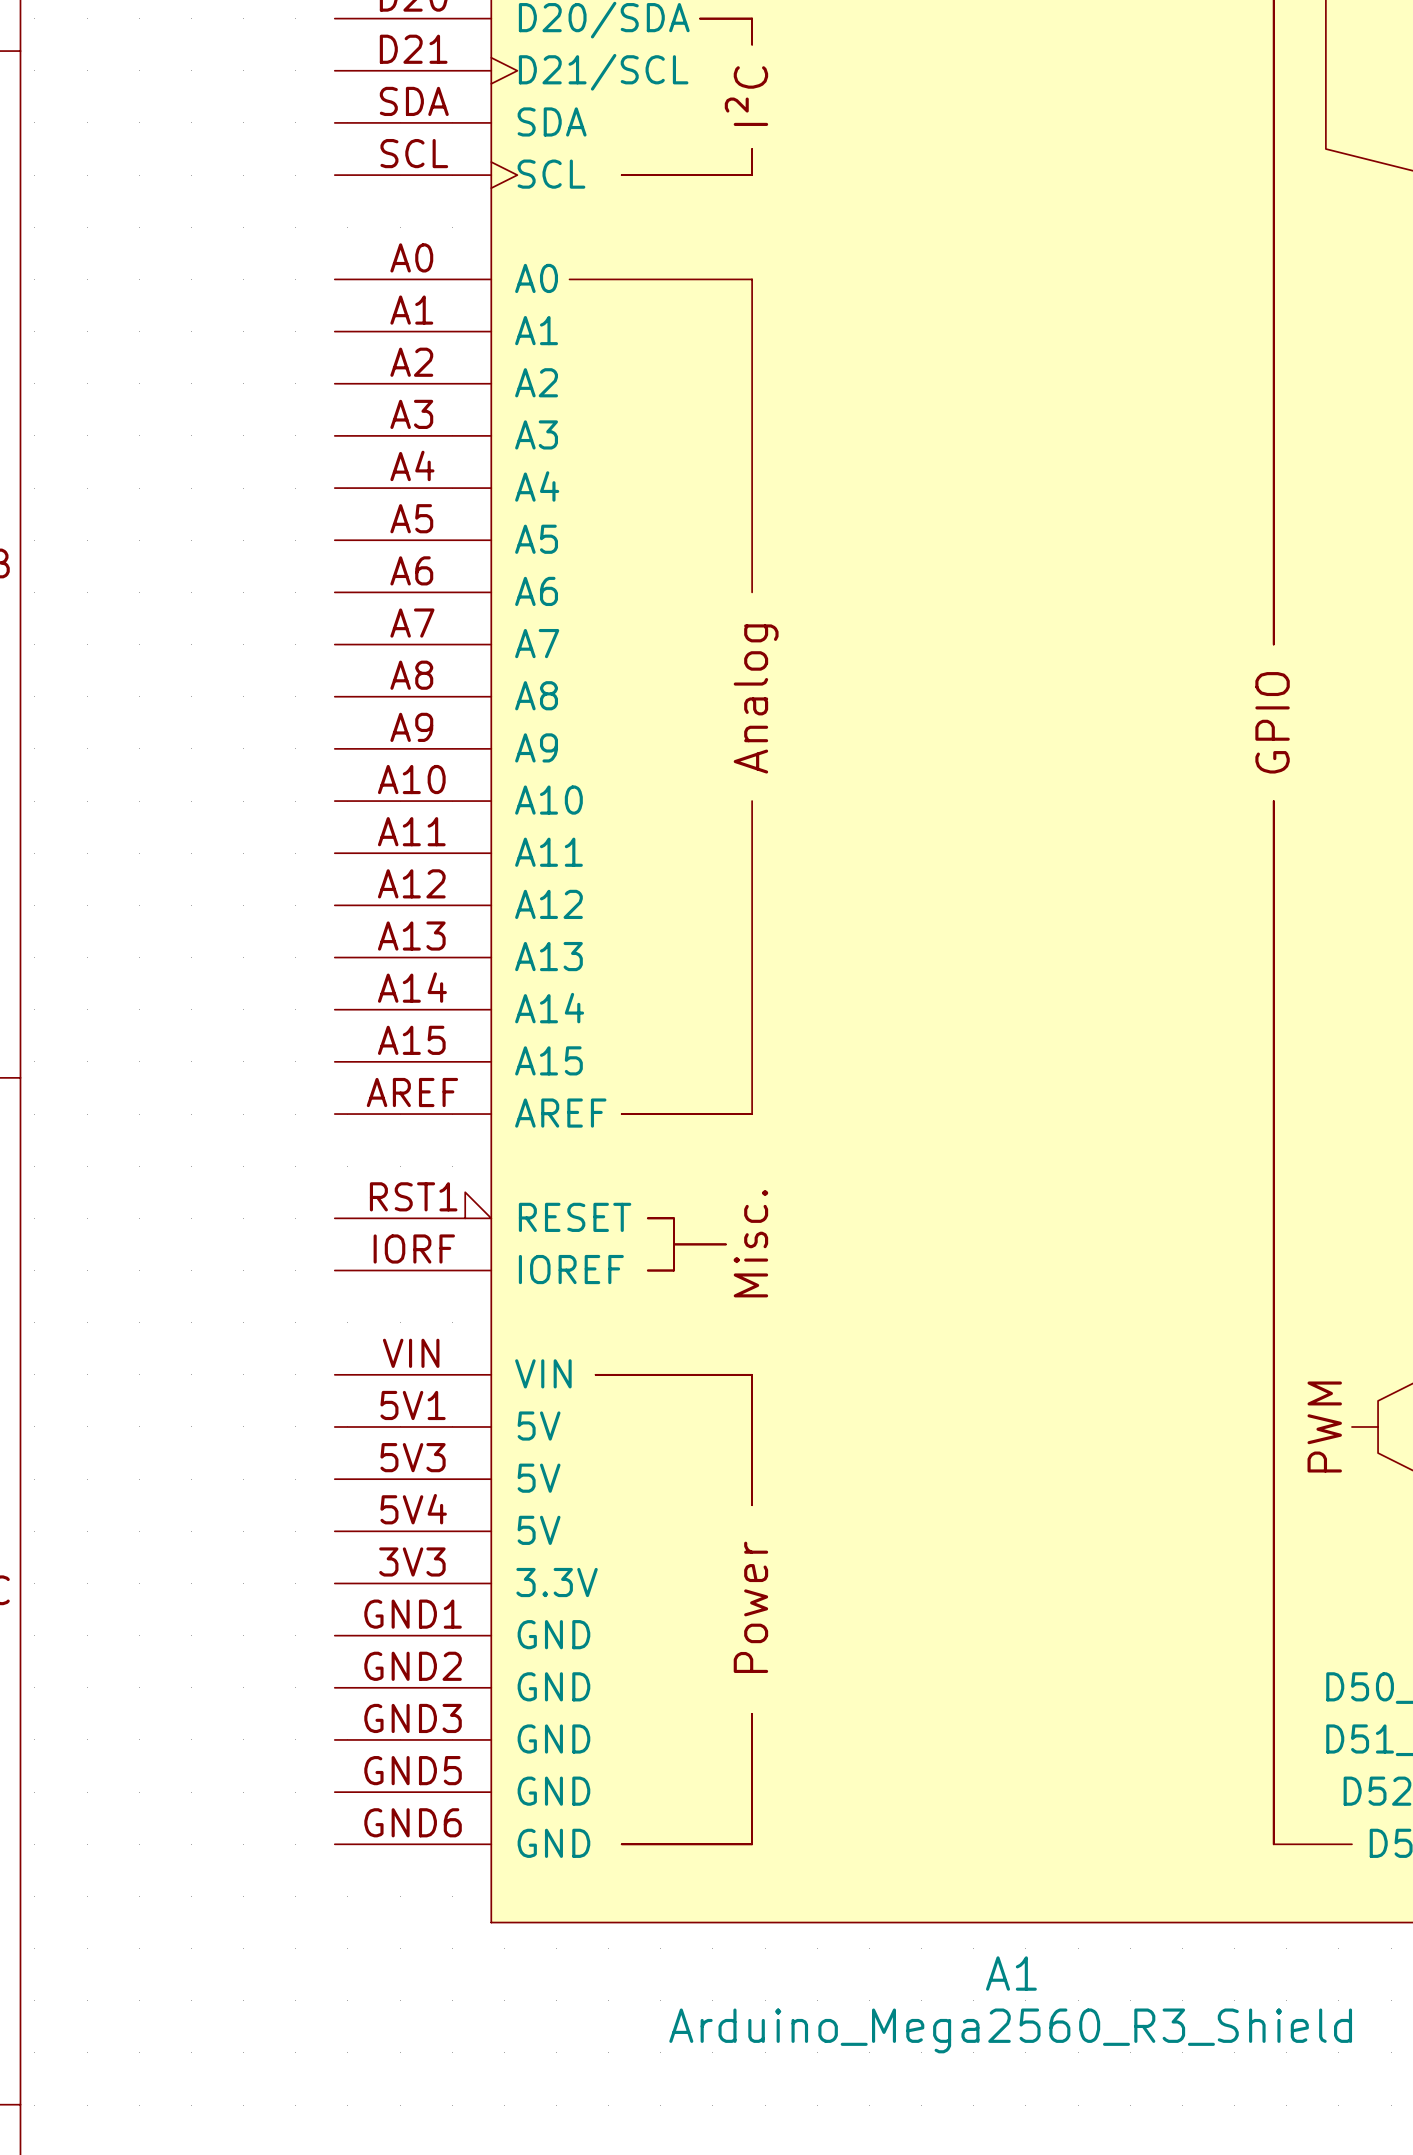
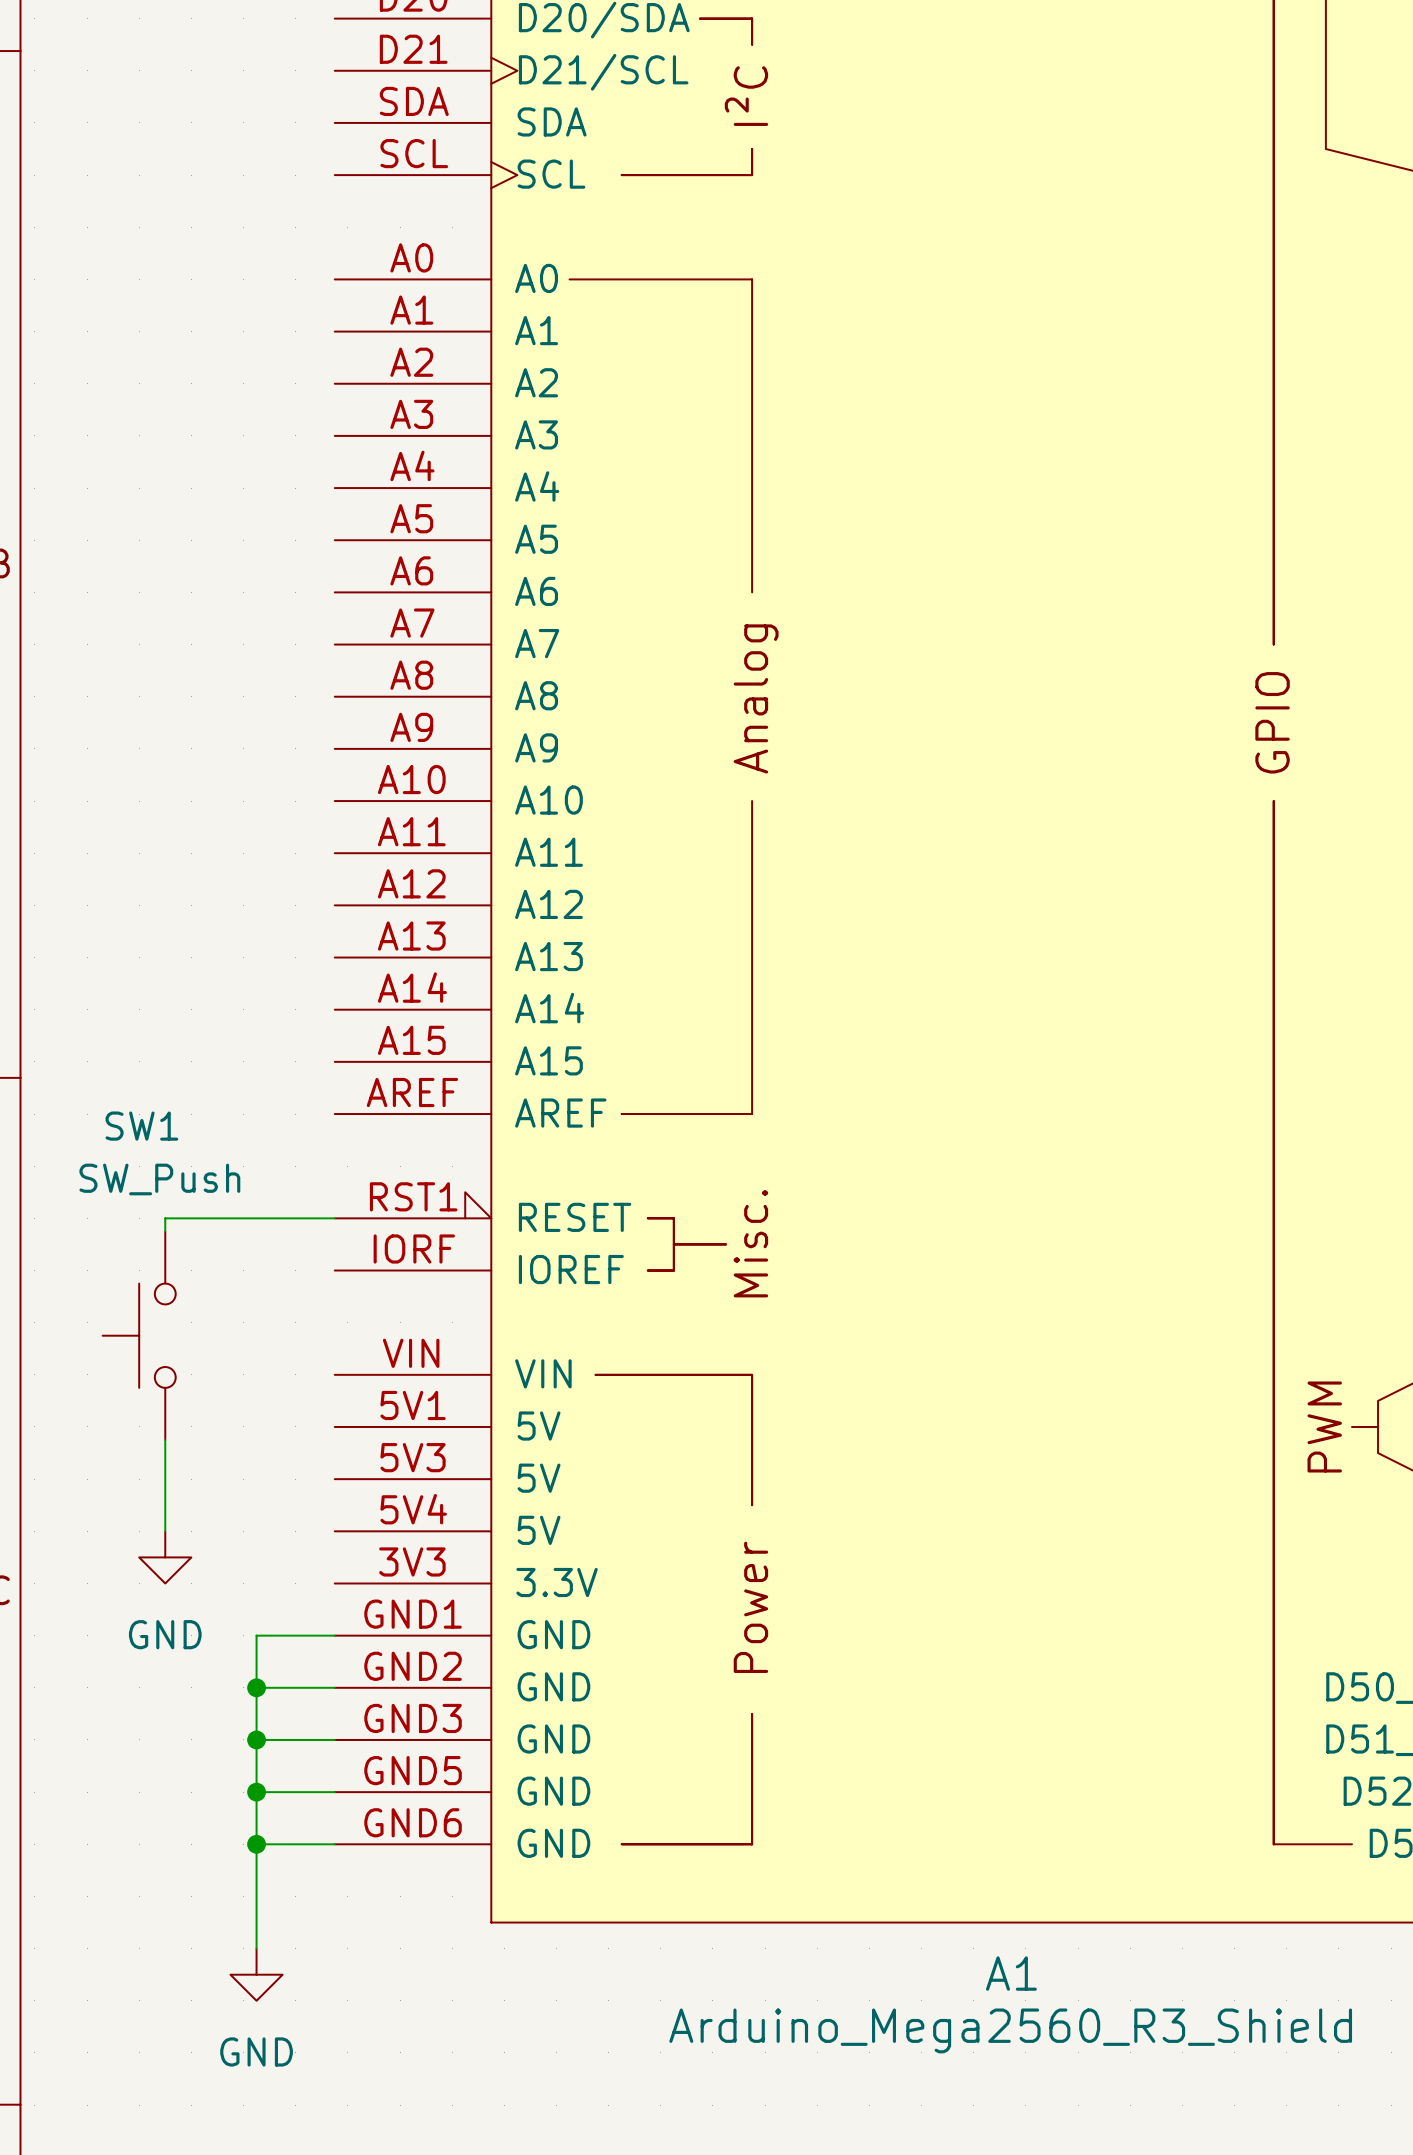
wire: none -> (334, 1218) (165, 1218) (165, 1231)
SW1: none -> SW_Push (139, 1335)
wire: none -> (165, 1440) (165, 1531)
power symbol: none -> GND (165, 1557)
wire: none -> (334, 1635) (256, 1635) (256, 1948)
wire: none -> (256, 1687) (334, 1687)
junction: none -> (256, 1687)
wire: none -> (256, 1739) (334, 1739)
junction: none -> (256, 1739)
wire: none -> (256, 1792) (334, 1792)
junction: none -> (256, 1792)
wire: none -> (256, 1844) (334, 1844)
junction: none -> (256, 1844)
power symbol: none -> GND (256, 1974)

